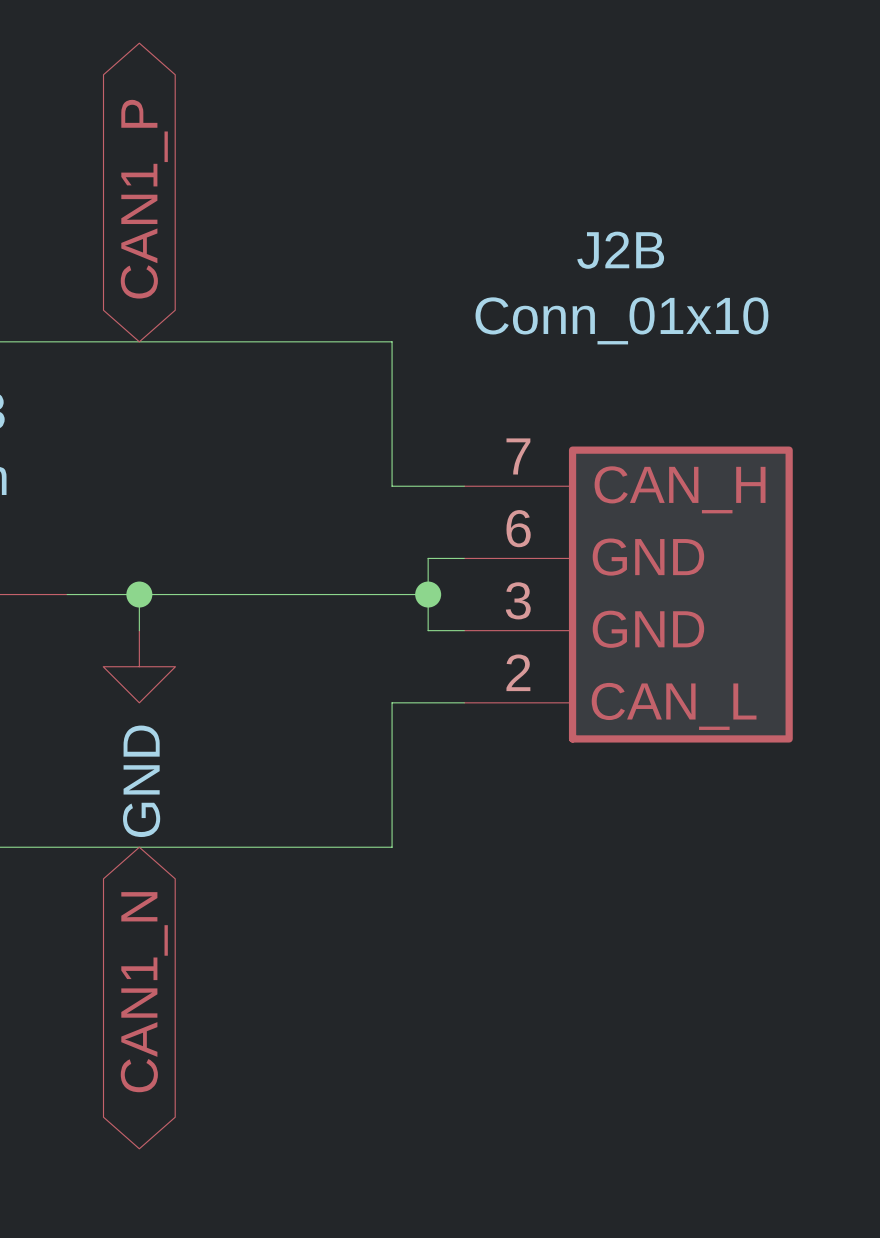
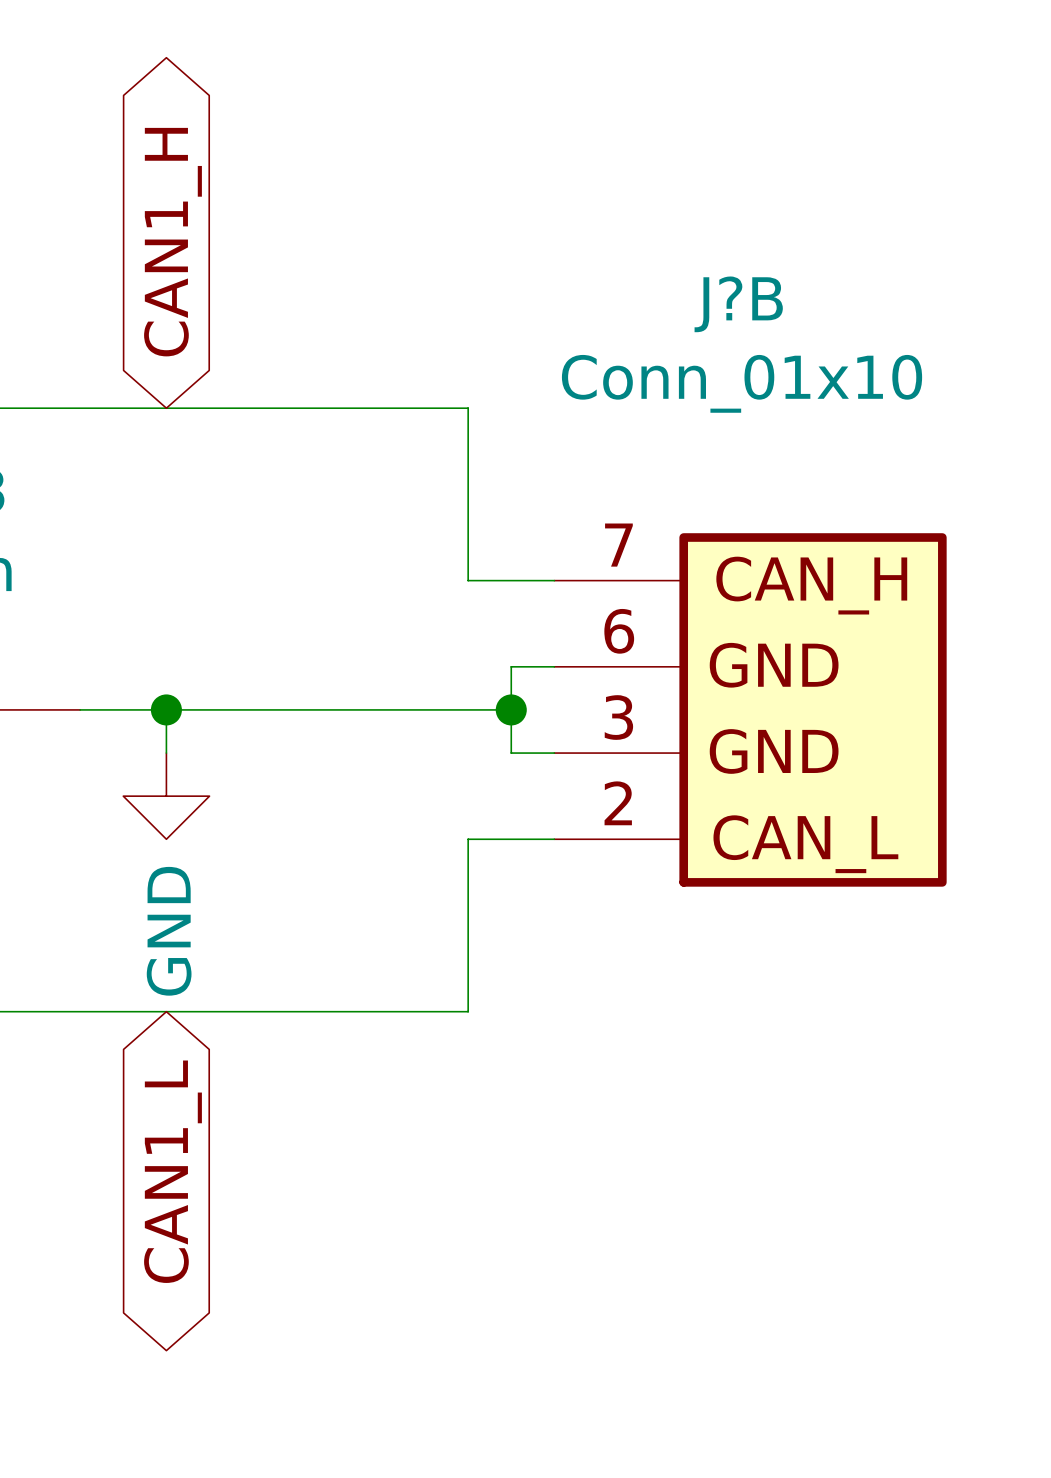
global label: CAN1_P (144, 199) -> CAN1_H (172, 242)
J2B name: J2B (620, 250) -> J?B (738, 304)
global label: CAN1_N (144, 992) -> CAN1_L (172, 1171)

